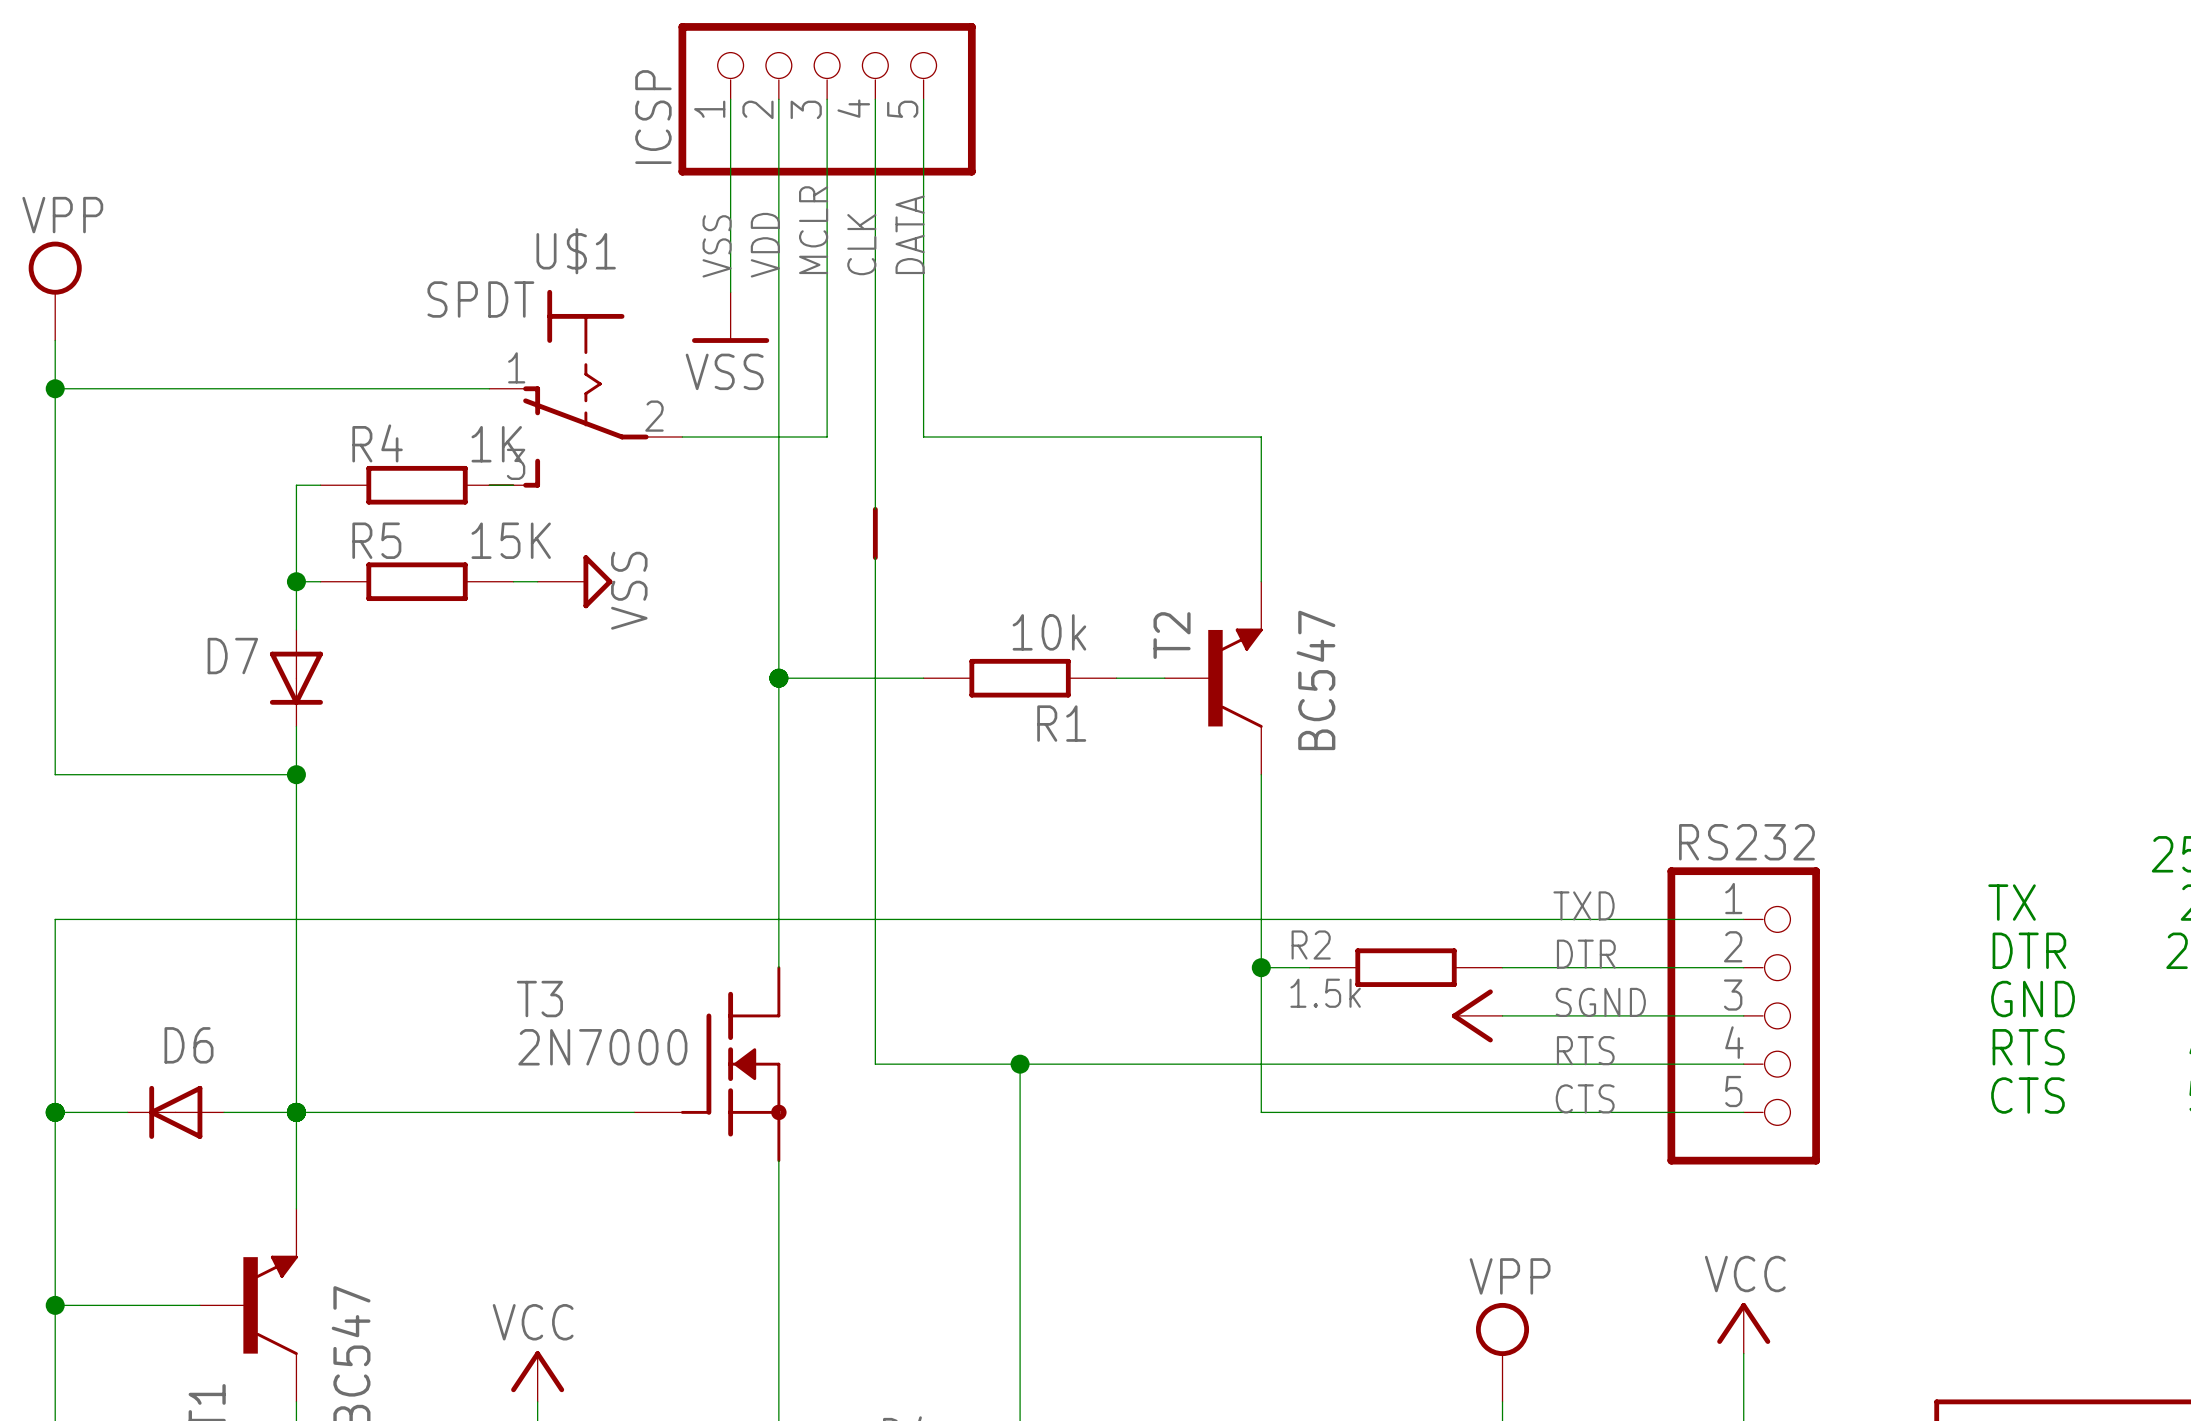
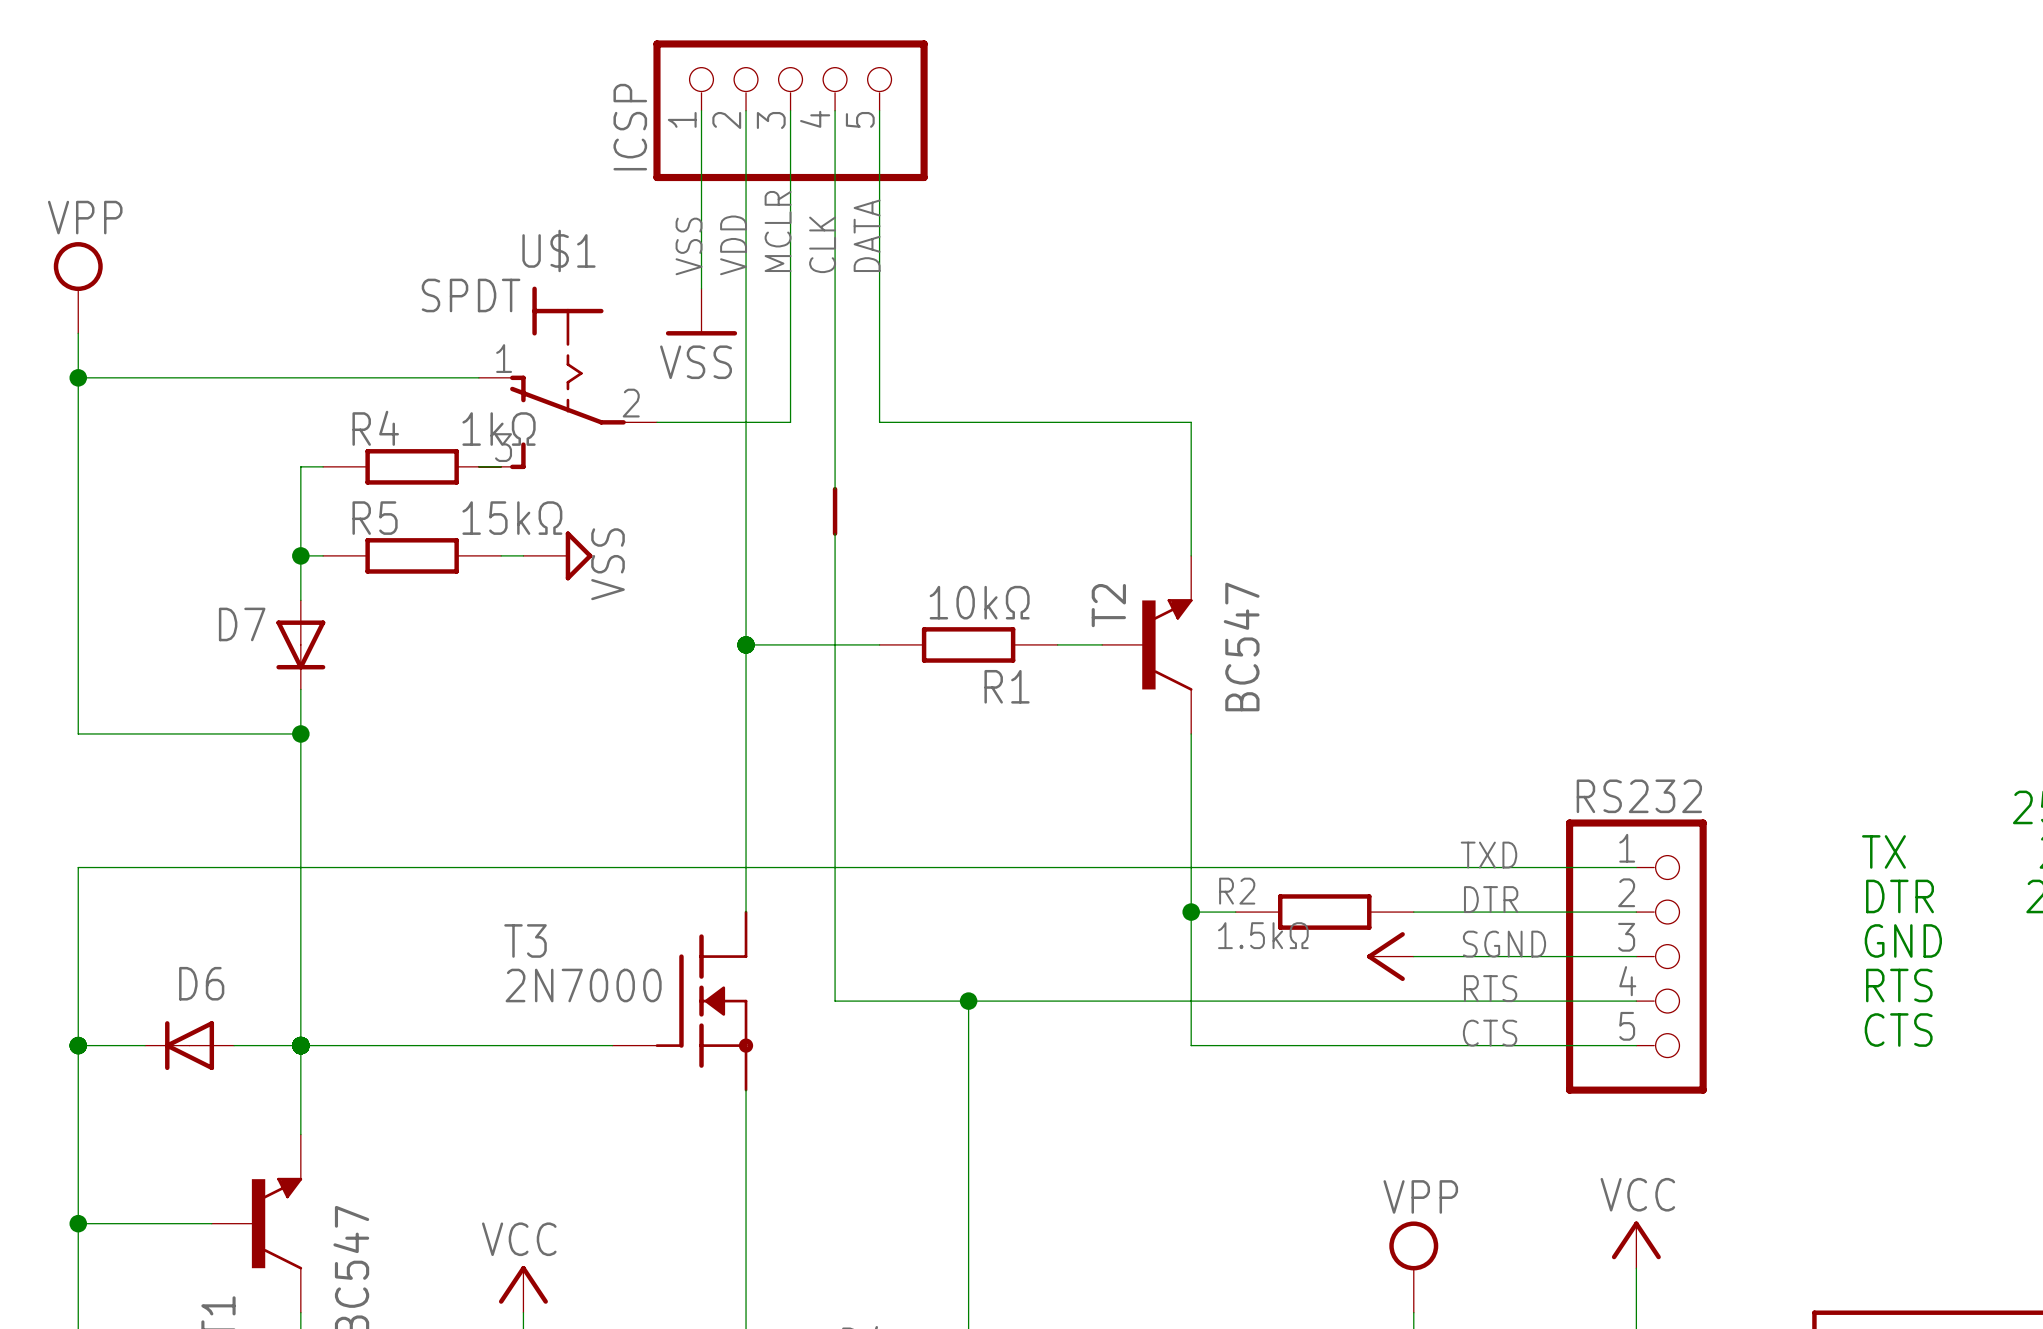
R4 value: 1K (496, 444) -> 1kΩ (499, 429)
R5 value: 15K (511, 540) -> 15kΩ (512, 518)
R1 value: 10k (1049, 632) -> 10kΩ (979, 602)
R2 value: 1.5k (1325, 993) -> 1.5kΩ (1263, 935)

